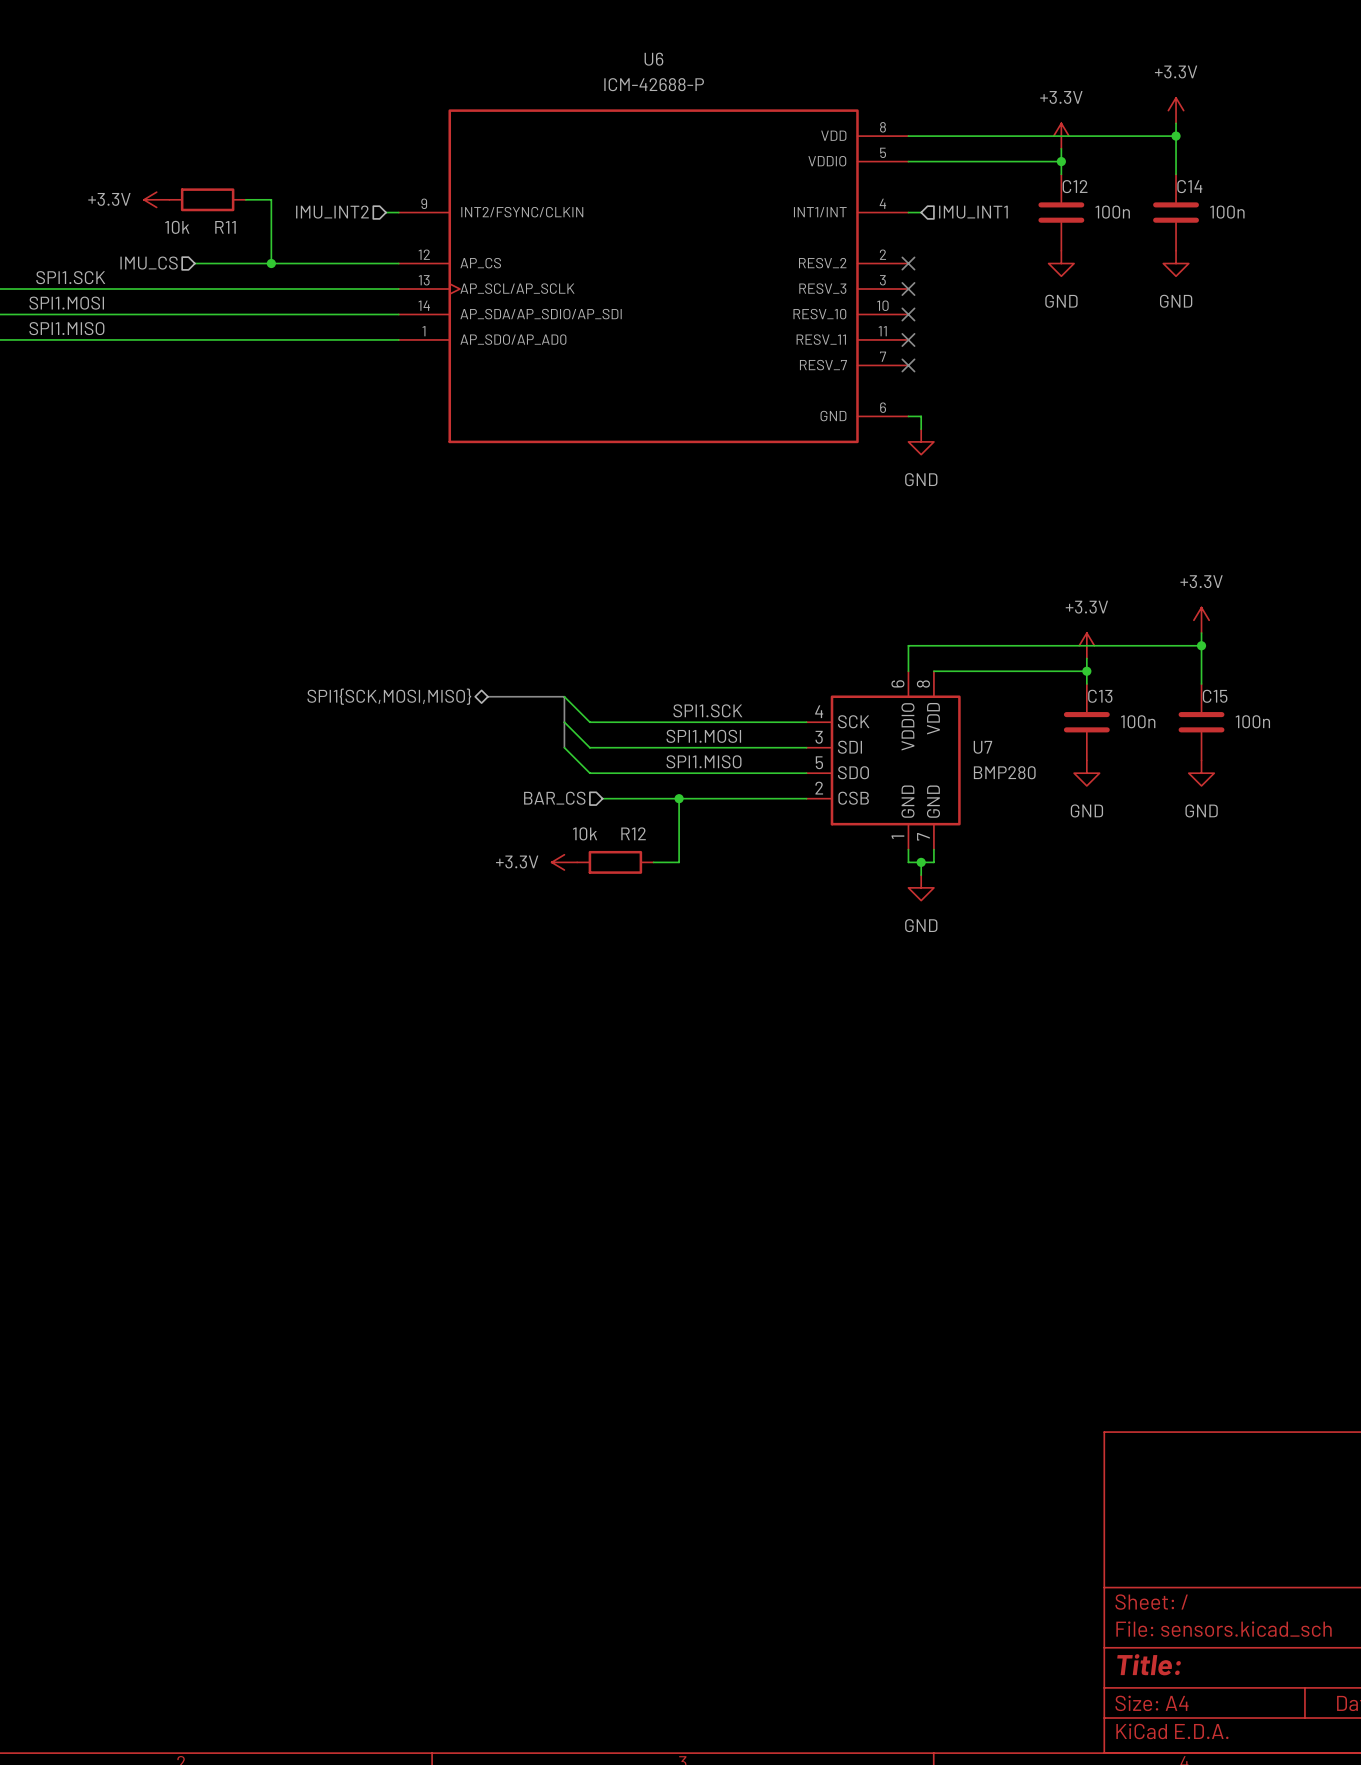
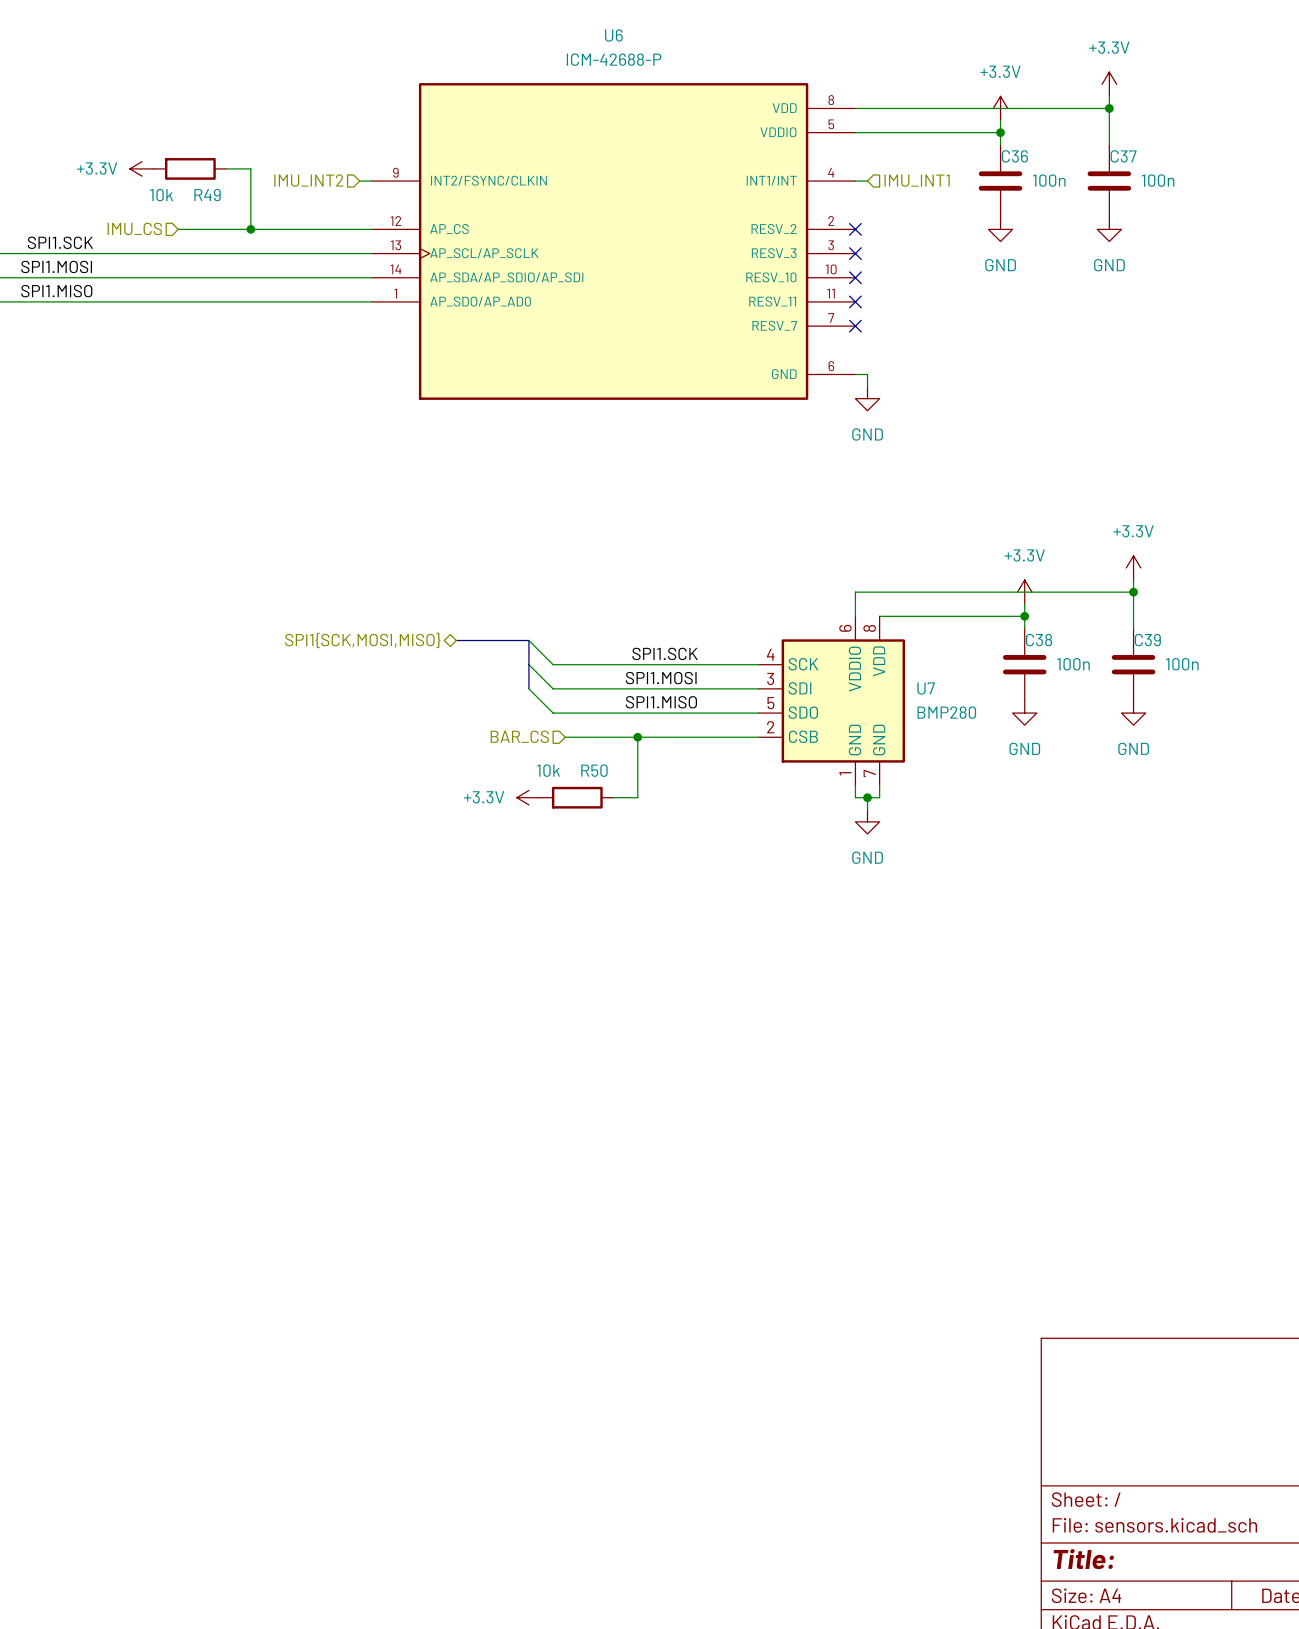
C12 name: C12 (1075, 186) -> C36 (1014, 156)
C14 name: C14 (1189, 186) -> C37 (1123, 156)
R11 name: R11 (225, 227) -> R49 (207, 195)
C13 name: C13 (1100, 696) -> C38 (1039, 640)
C15 name: C15 (1215, 696) -> C39 (1147, 640)
R12 name: R12 (633, 833) -> R50 (594, 770)

